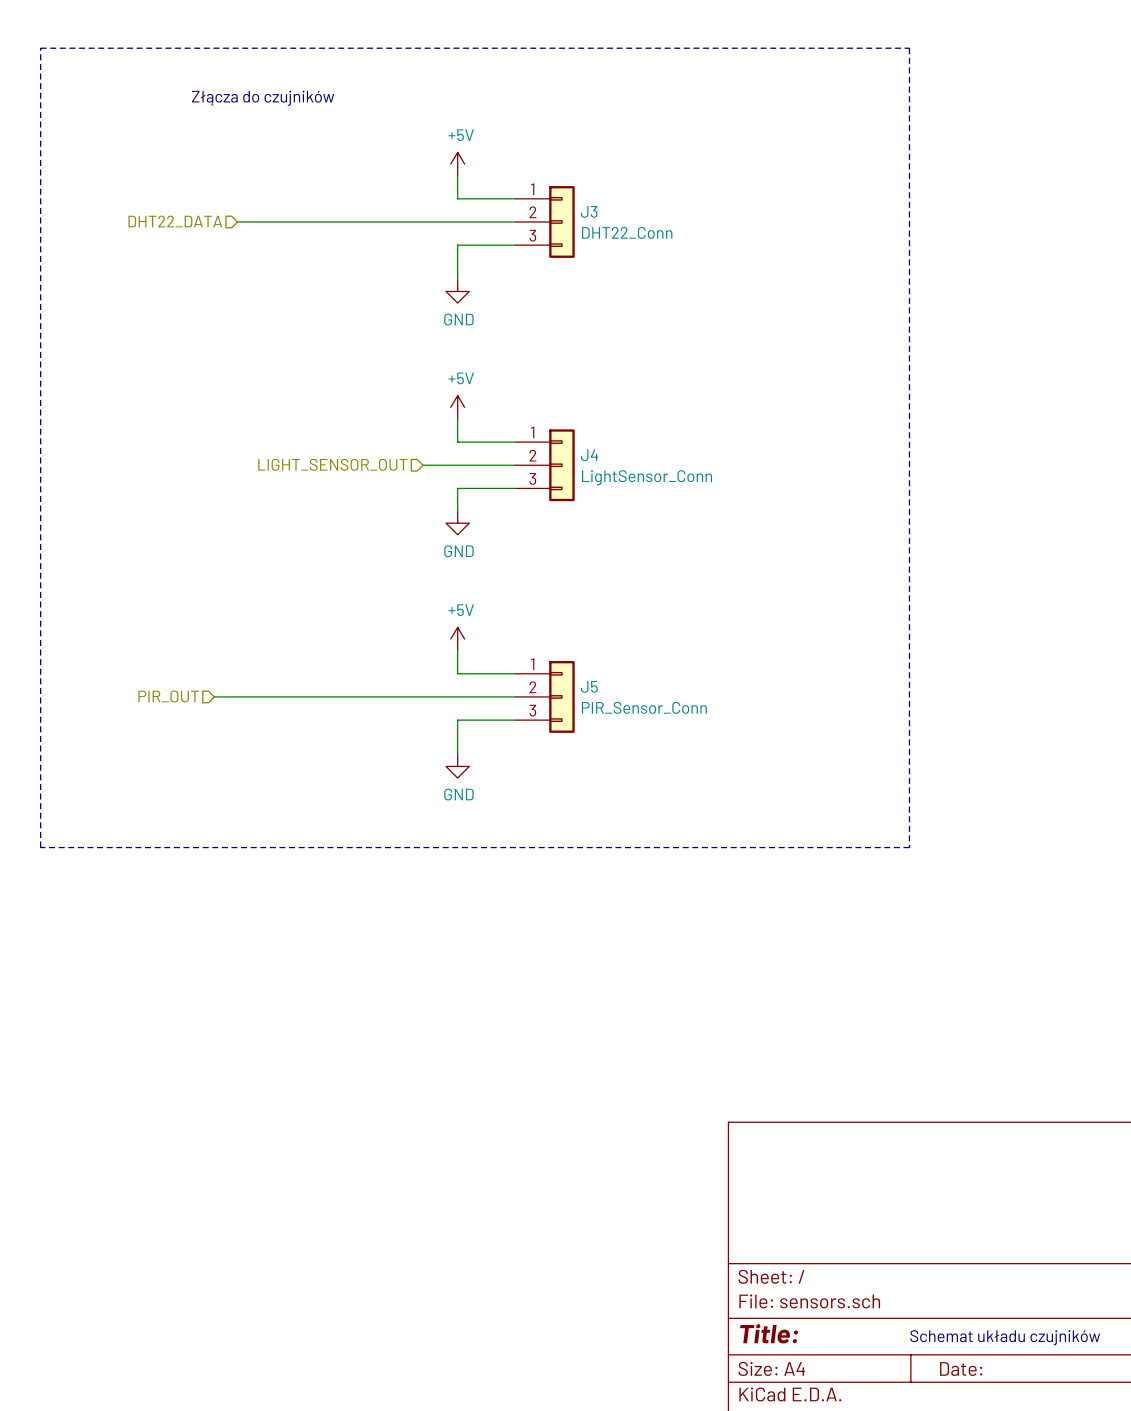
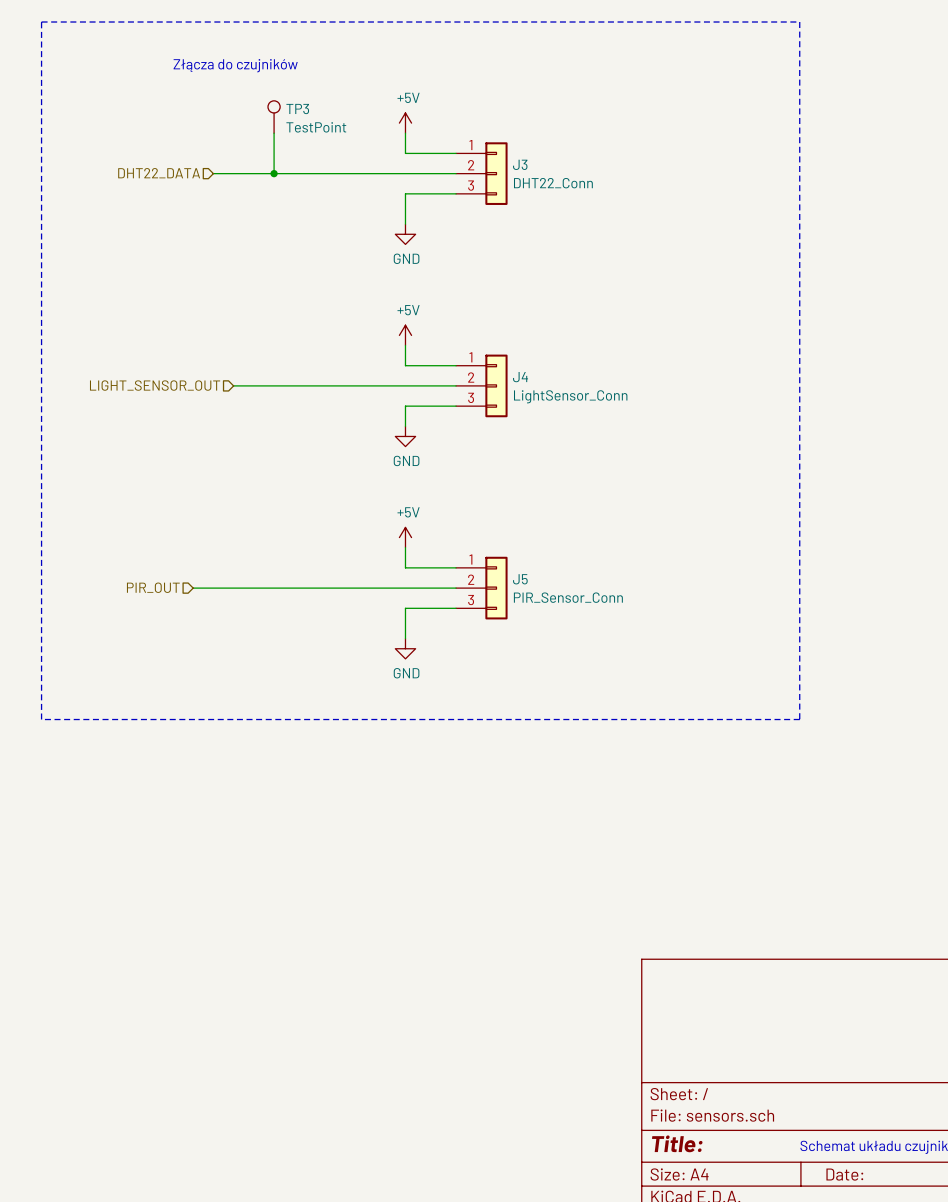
TP3: none -> TestPoint (274, 117)
wire: none -> (274, 133) (274, 173)
junction: none -> (274, 173)
hierarchical label position: LIGHT_SENSOR_OUT (332, 464) -> LIGHT_SENSOR_OUT (155, 385)
wire: none -> (233, 385) (375, 385)

